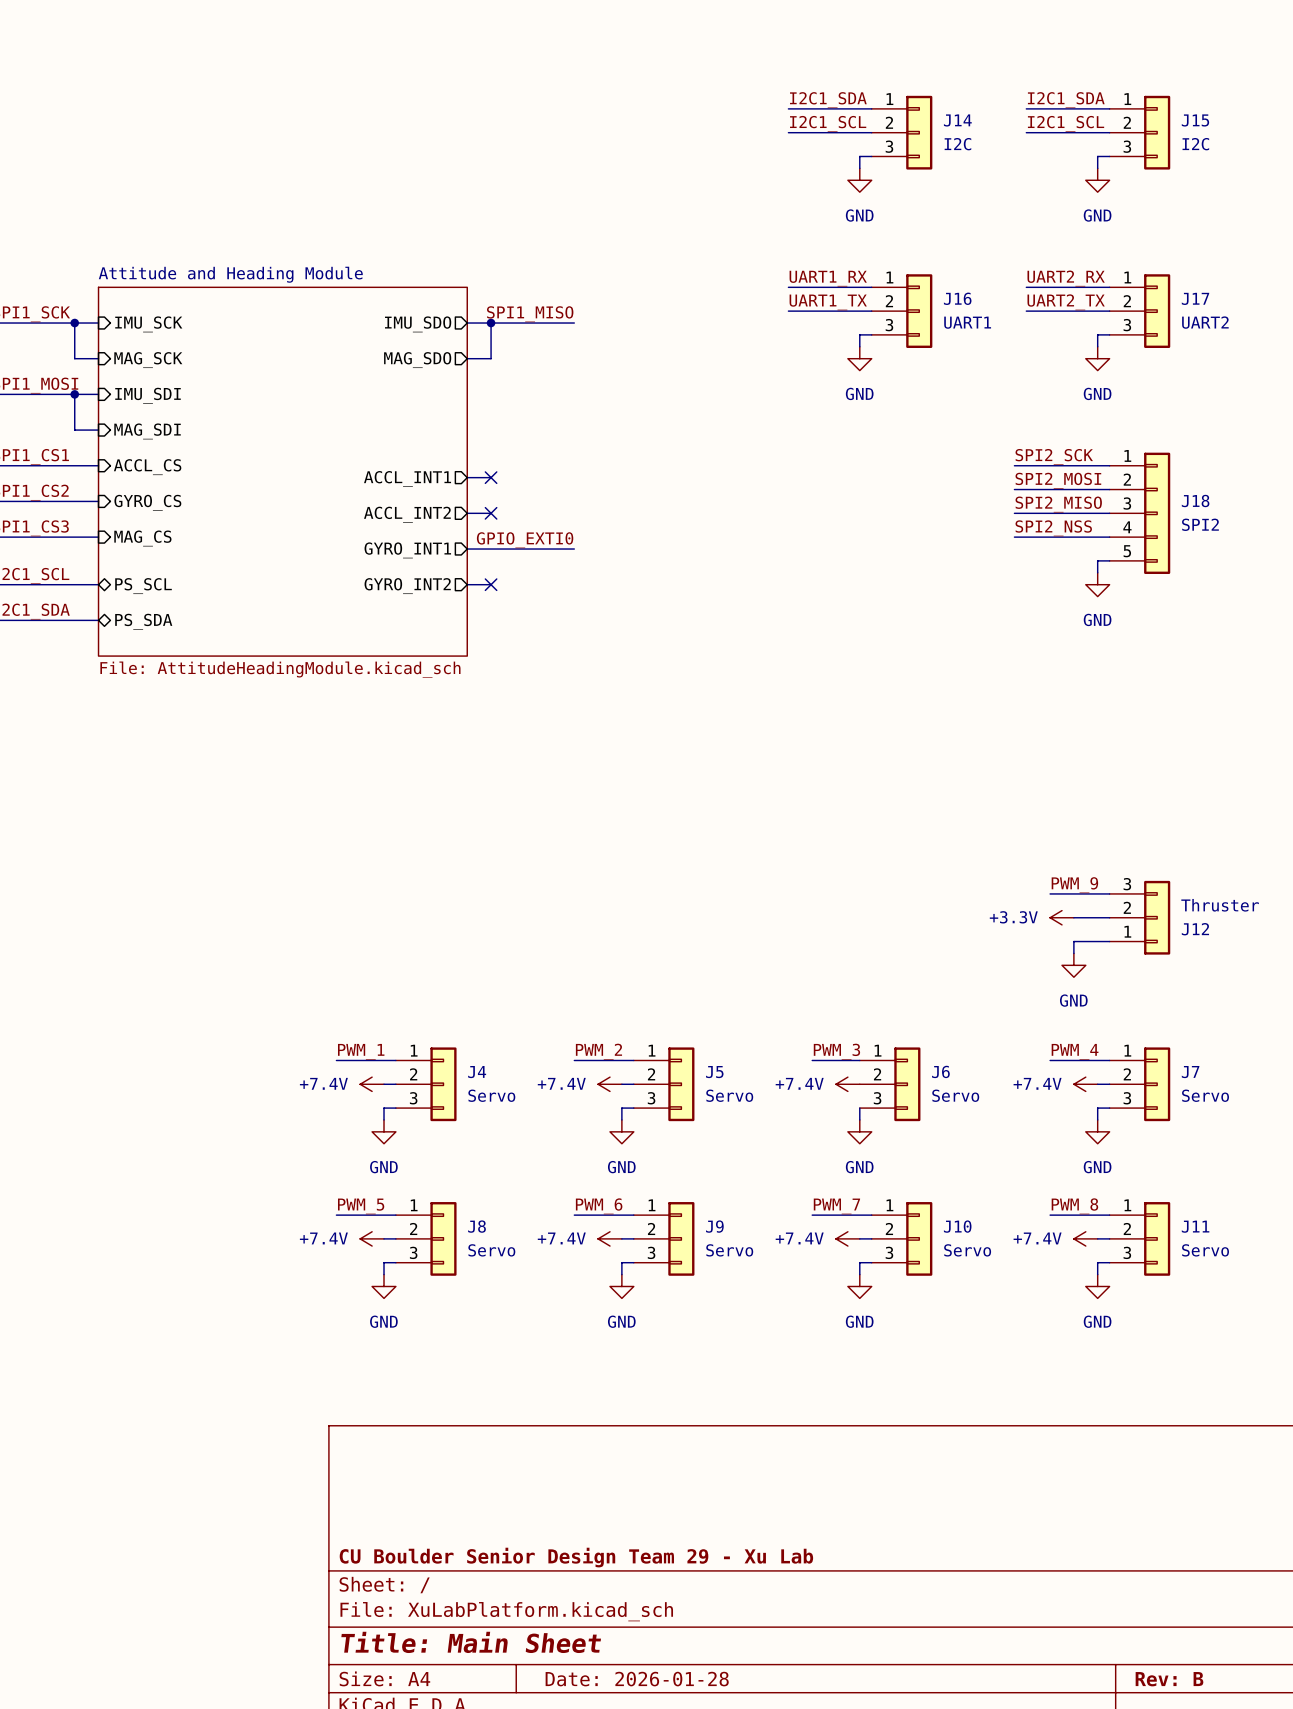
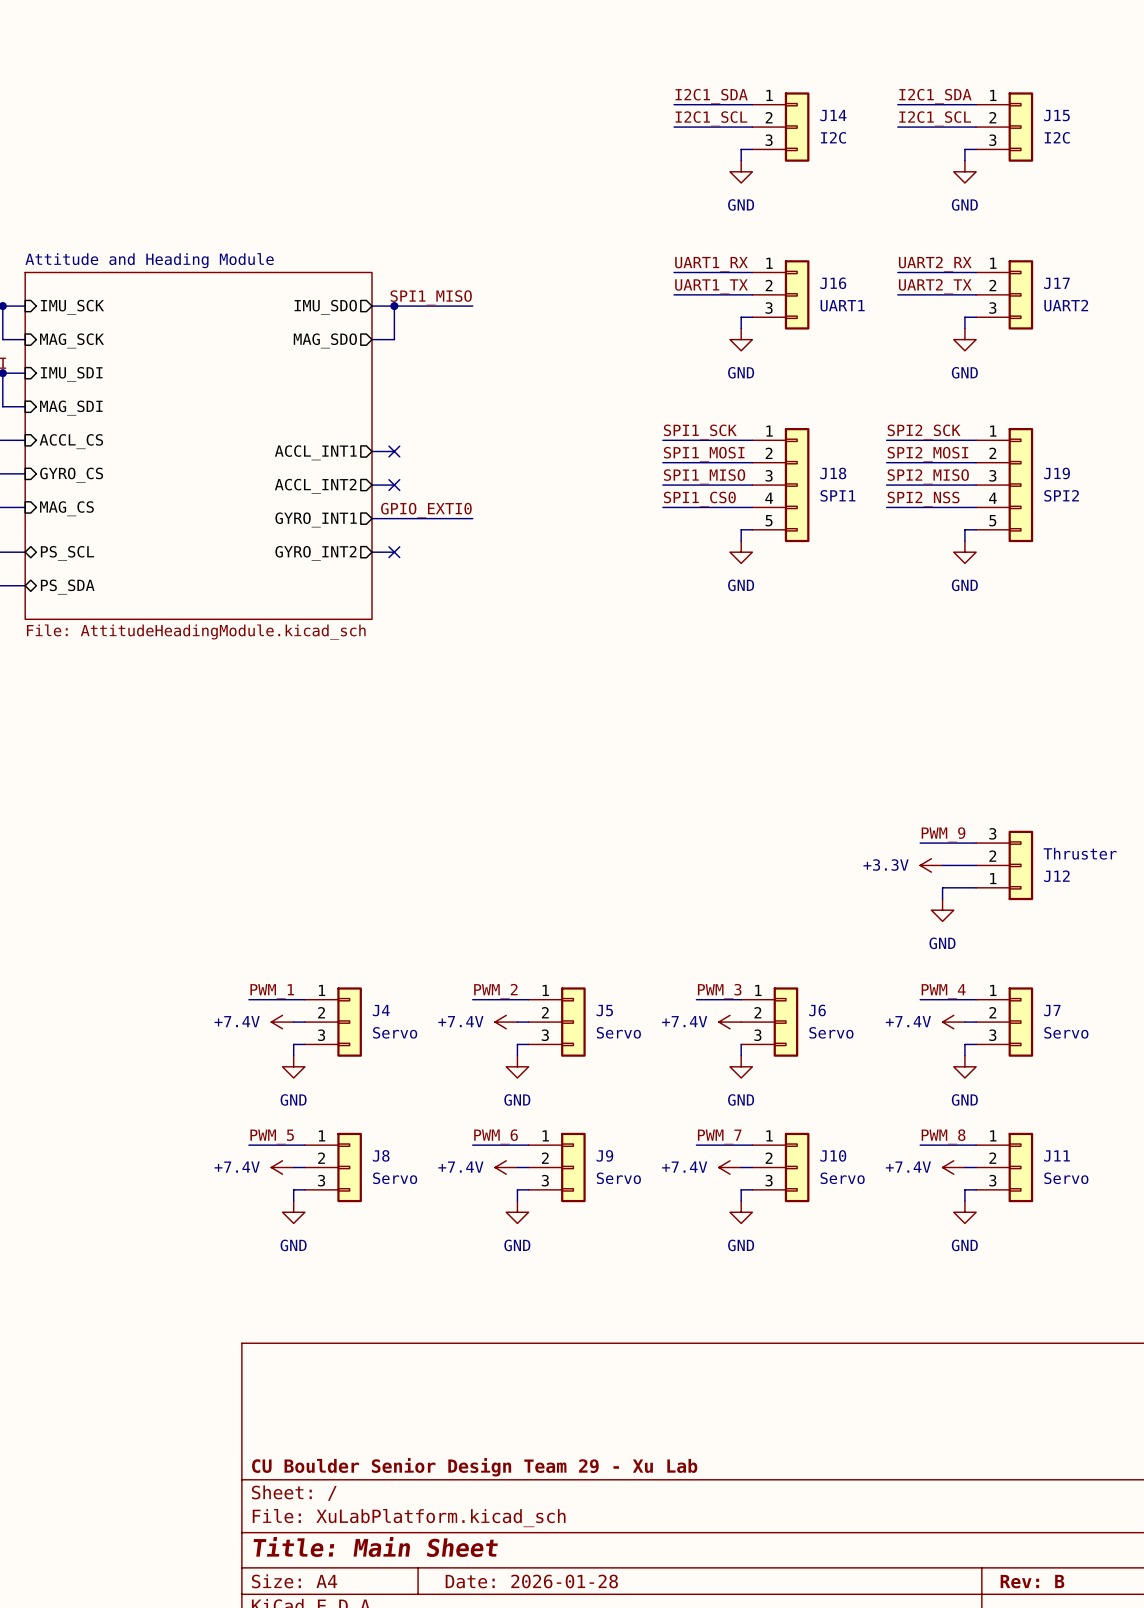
label: none -> SPI1_SCK (700, 432)
wire: none -> (662, 440) (752, 440)
label: none -> SPI1_MOSI (704, 454)
wire: none -> (662, 462) (752, 462)
J18 name: J18 (1195, 500) -> J19 (1057, 473)
label: none -> SPI1_MISO (704, 476)
wire: none -> (662, 485) (752, 485)
J18: none -> SPI1 (780, 485)
label: none -> SPI1_CS0 (699, 499)
wire: none -> (662, 507) (752, 507)
wire: none -> (752, 529) (741, 529) (741, 541)
power symbol: none -> GND (741, 552)

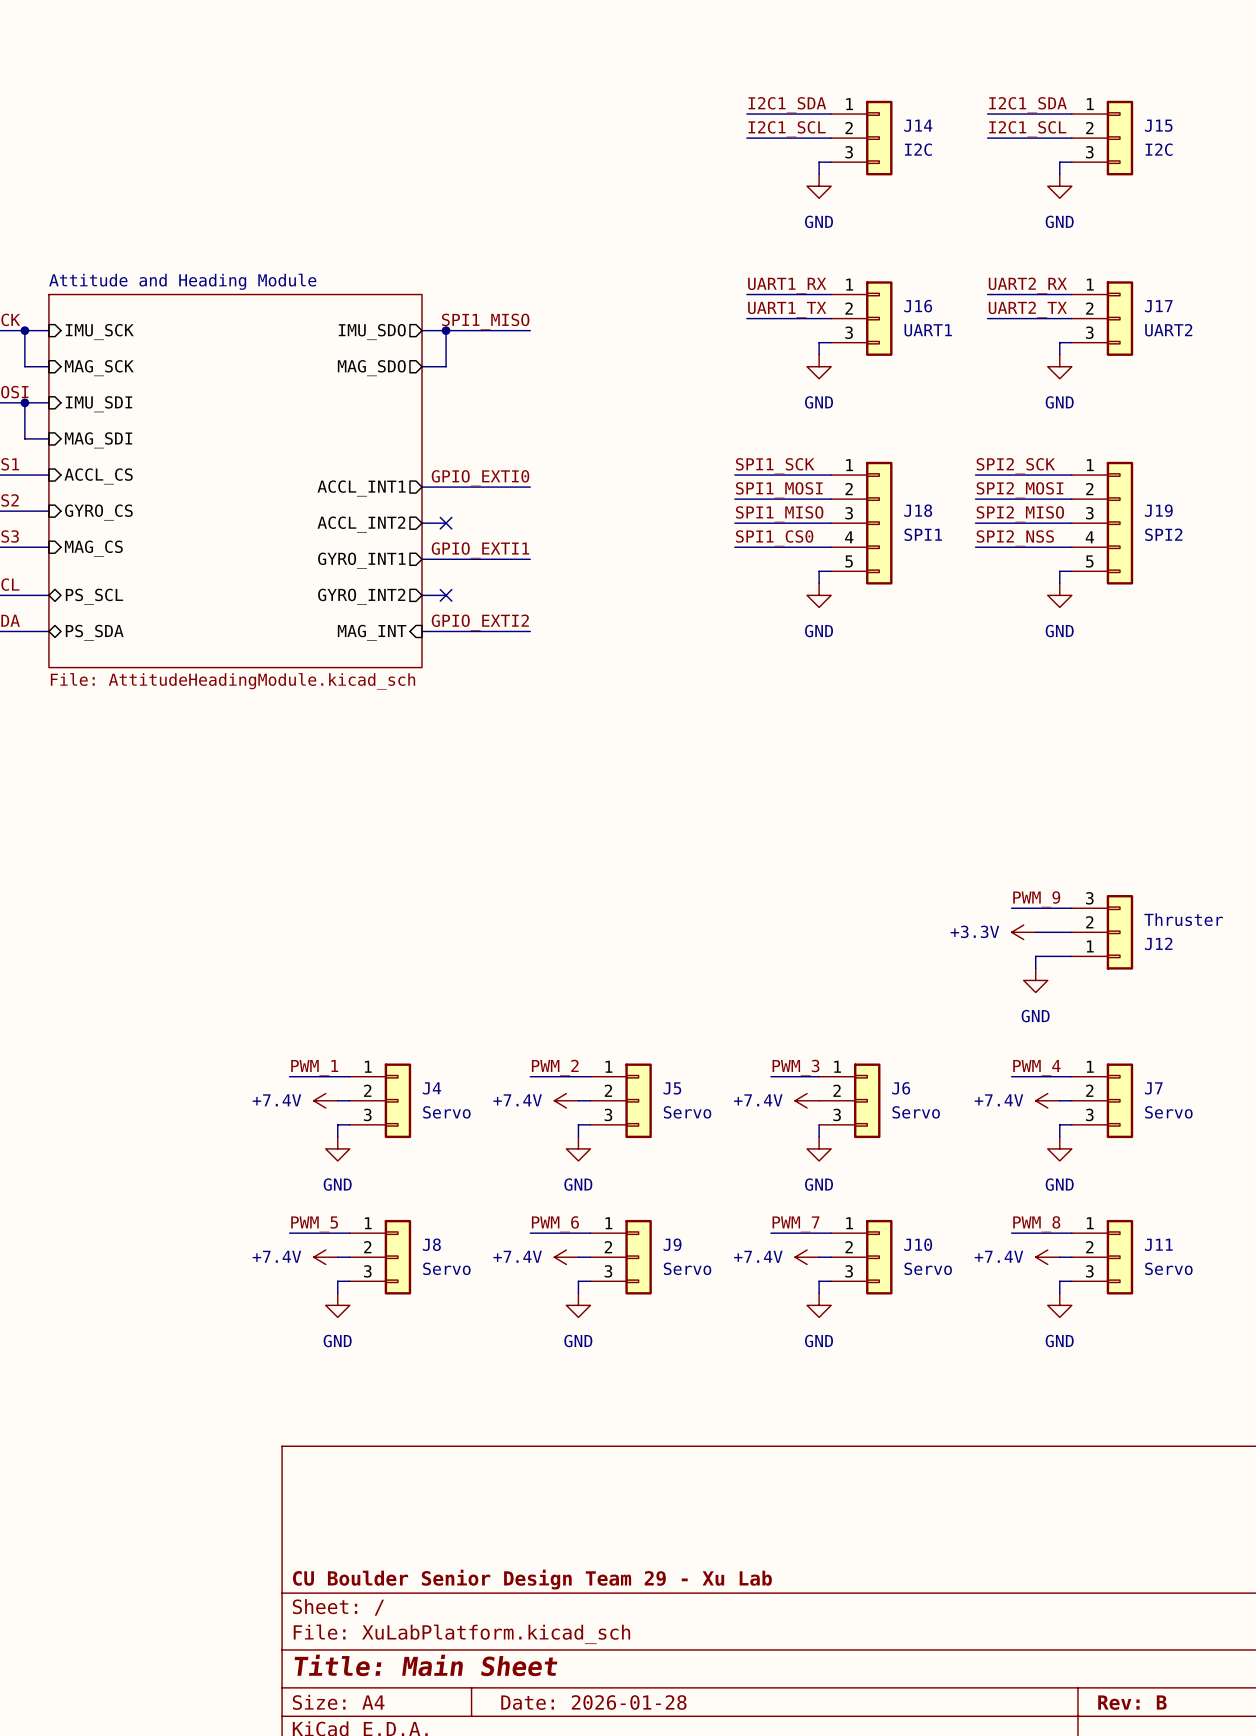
label: none -> GPIO_EXTI0 (480, 478)
wire: none -> (446, 487) (530, 487)
no-connect mark: (394, 451) -> none
label: GPIO_EXTI0 (426, 510) -> GPIO_EXTI1 (480, 550)
label: none -> GPIO_EXTI2 (480, 622)
wire: none -> (422, 631) (530, 631)
sheet pin: none -> MAG_INT (372, 632)

